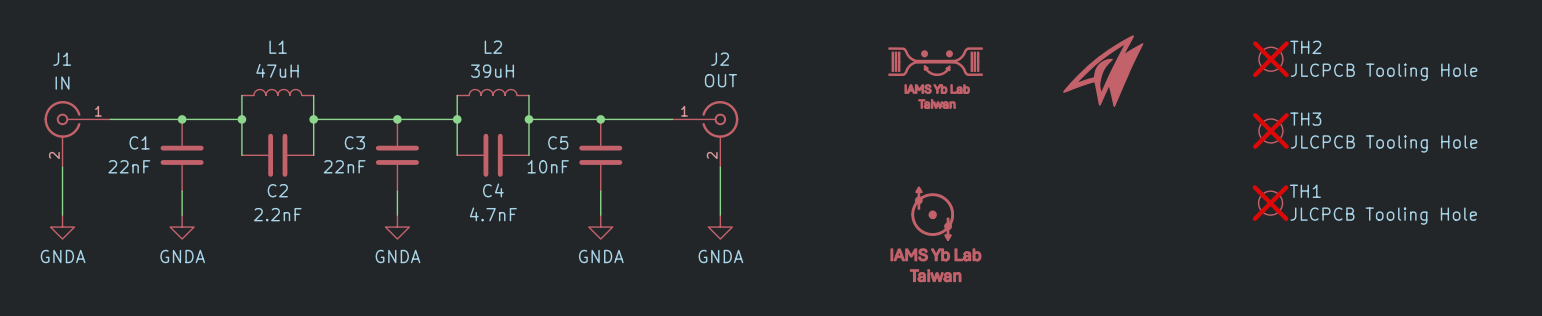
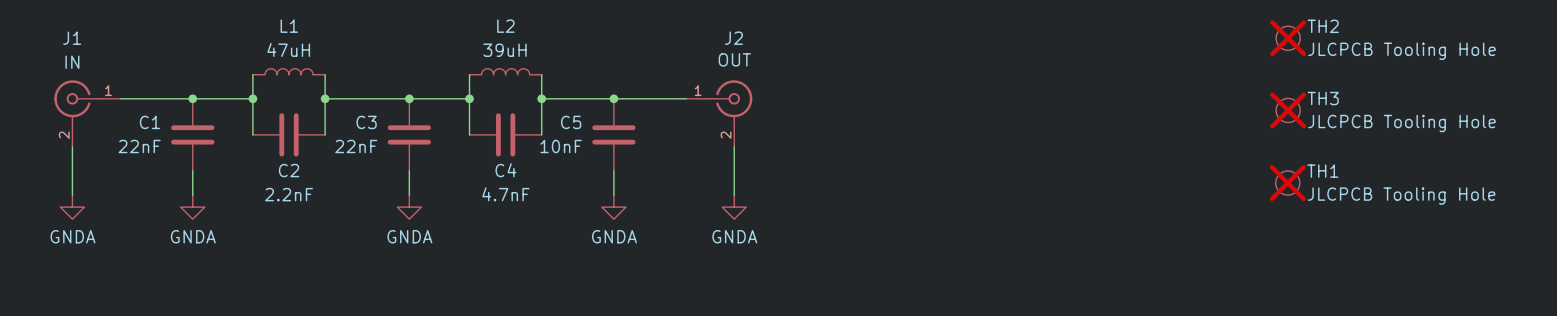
part: (1103, 71) -> none
part: (935, 78) -> none
part: (935, 234) -> none

